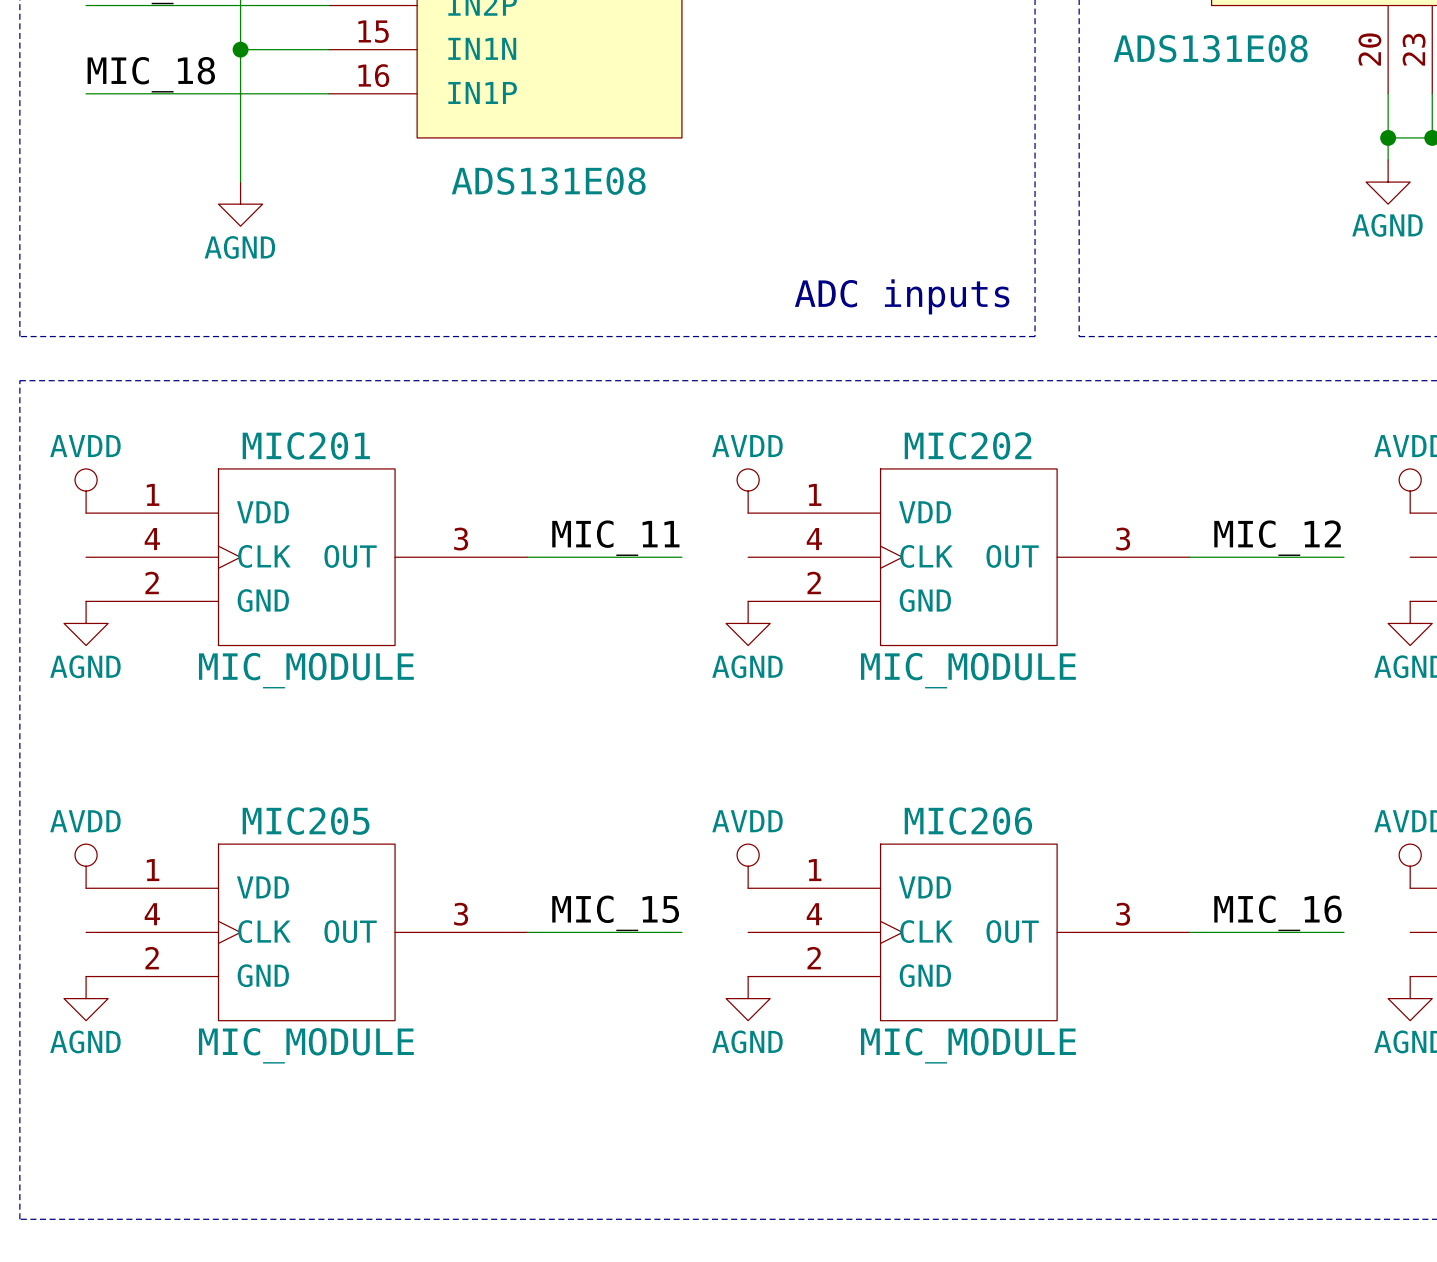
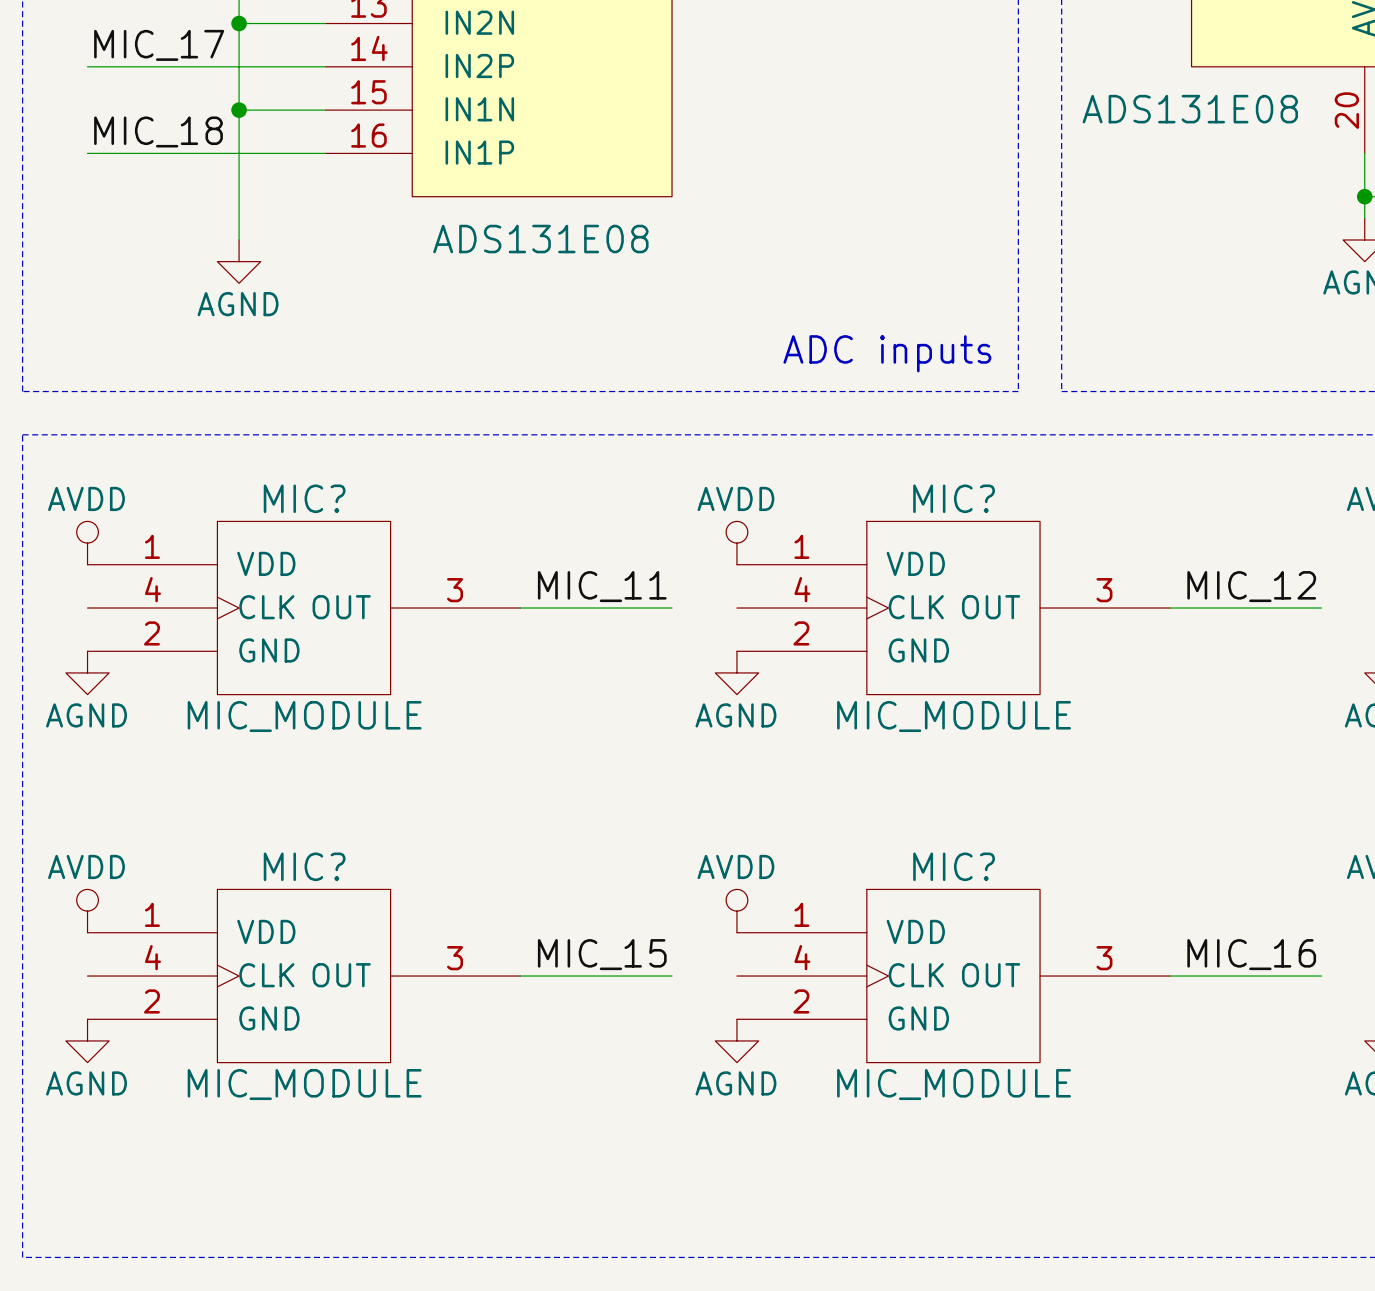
MIC201 name: MIC201 (306, 445) -> MIC? (304, 498)
MIC202 name: MIC202 (968, 445) -> MIC? (954, 498)
MIC205 name: MIC205 (306, 821) -> MIC? (304, 866)
MIC206 name: MIC206 (968, 821) -> MIC? (954, 866)

